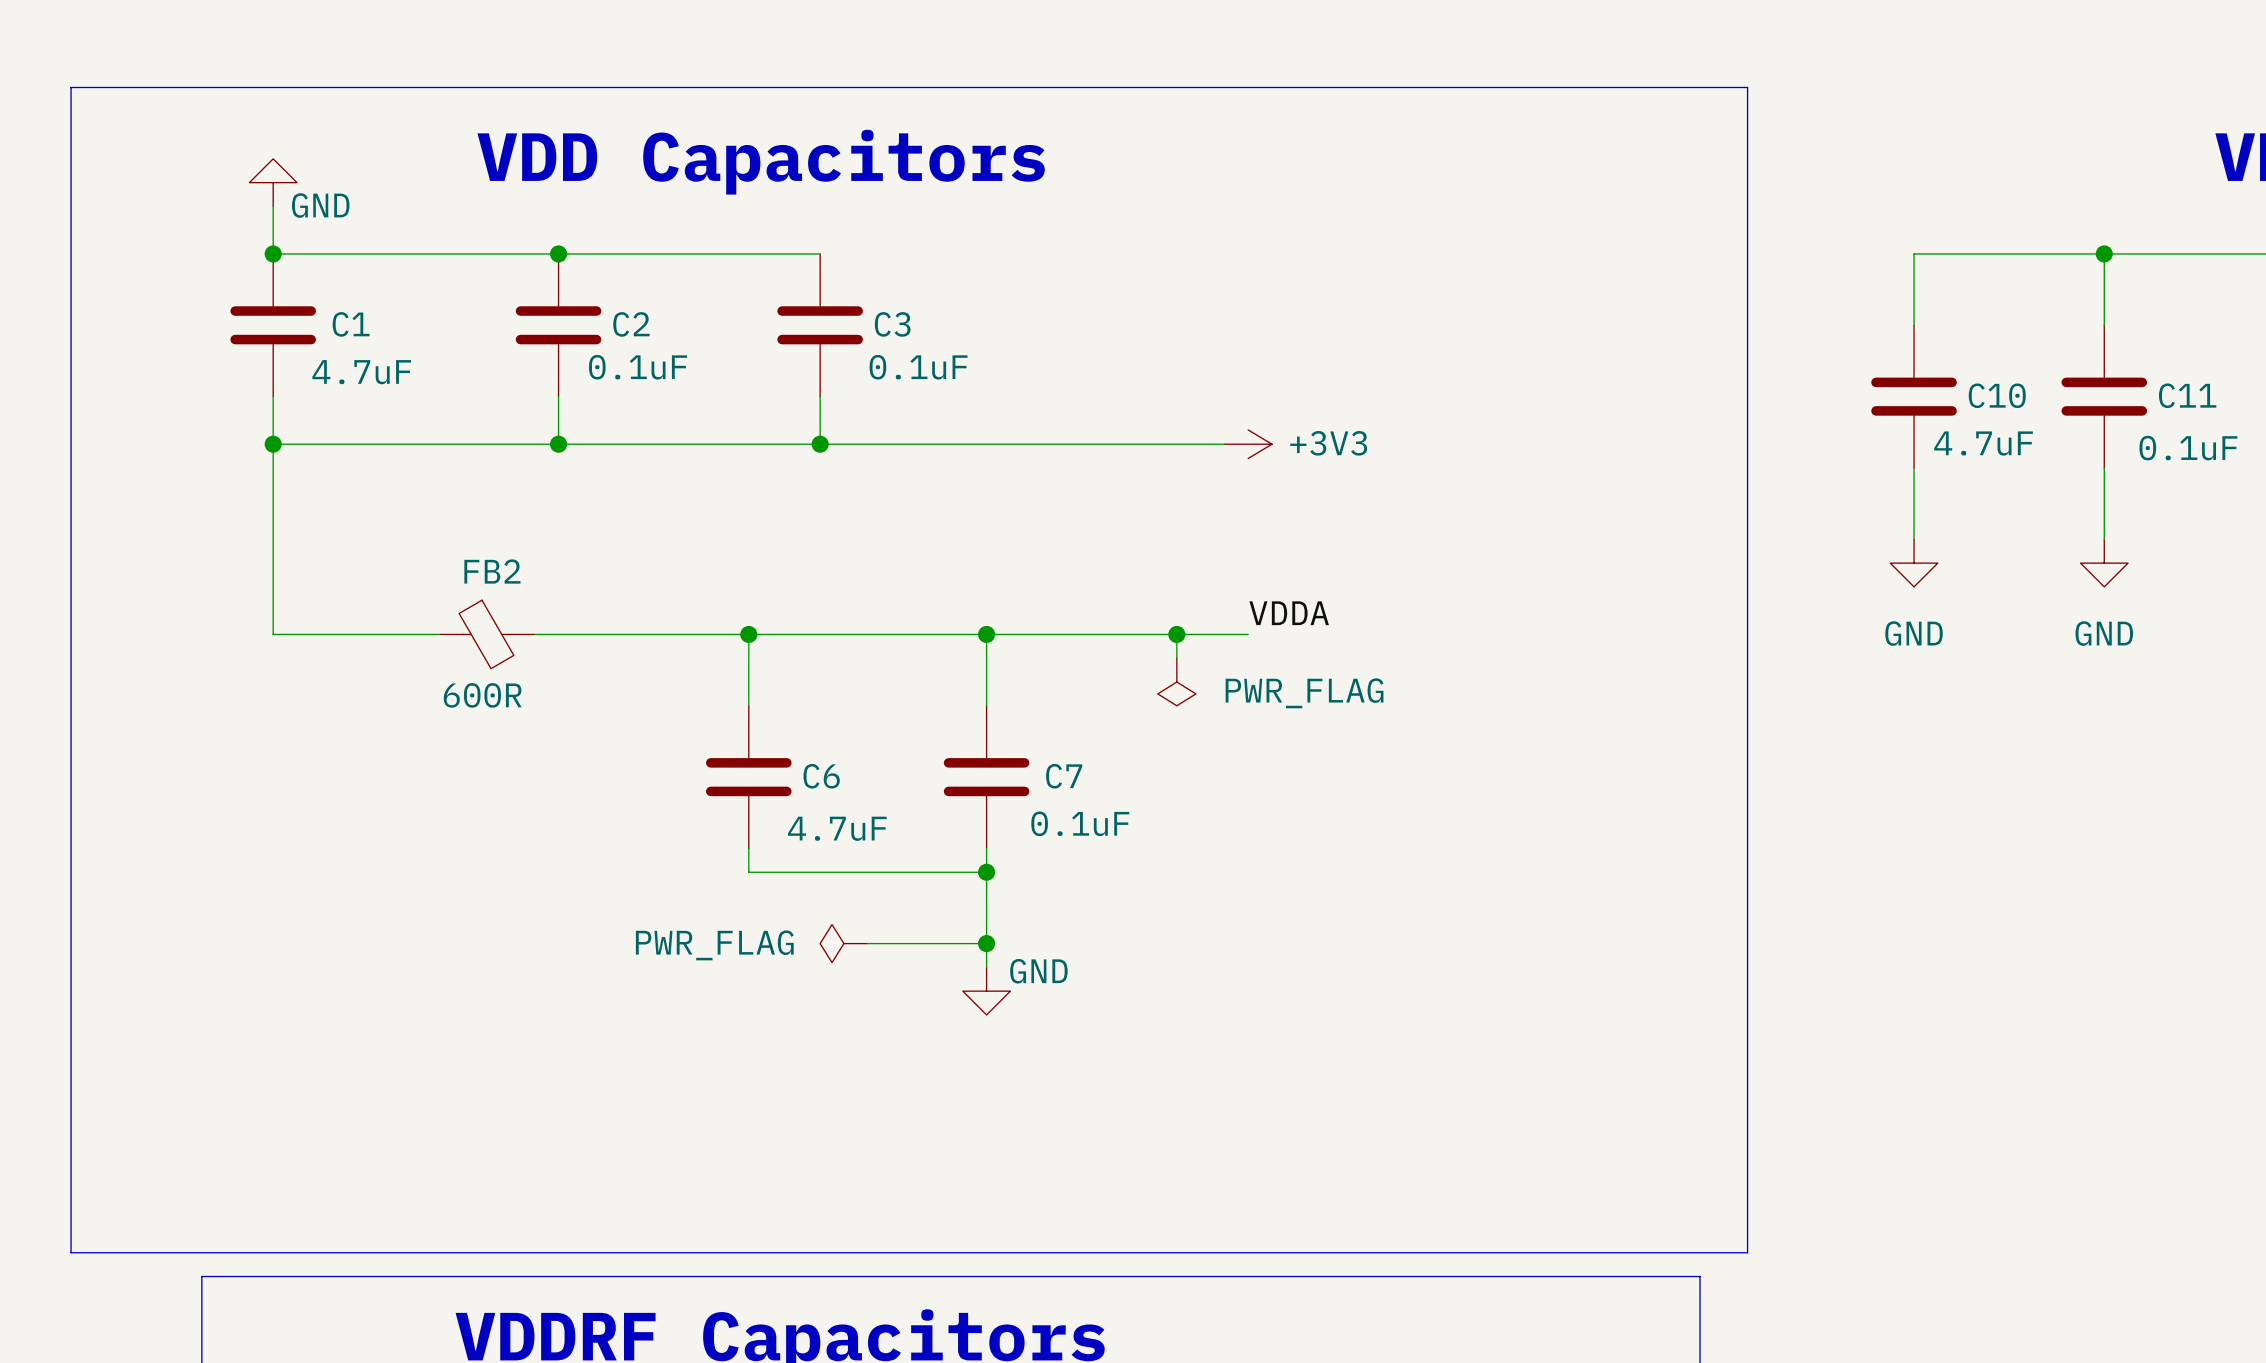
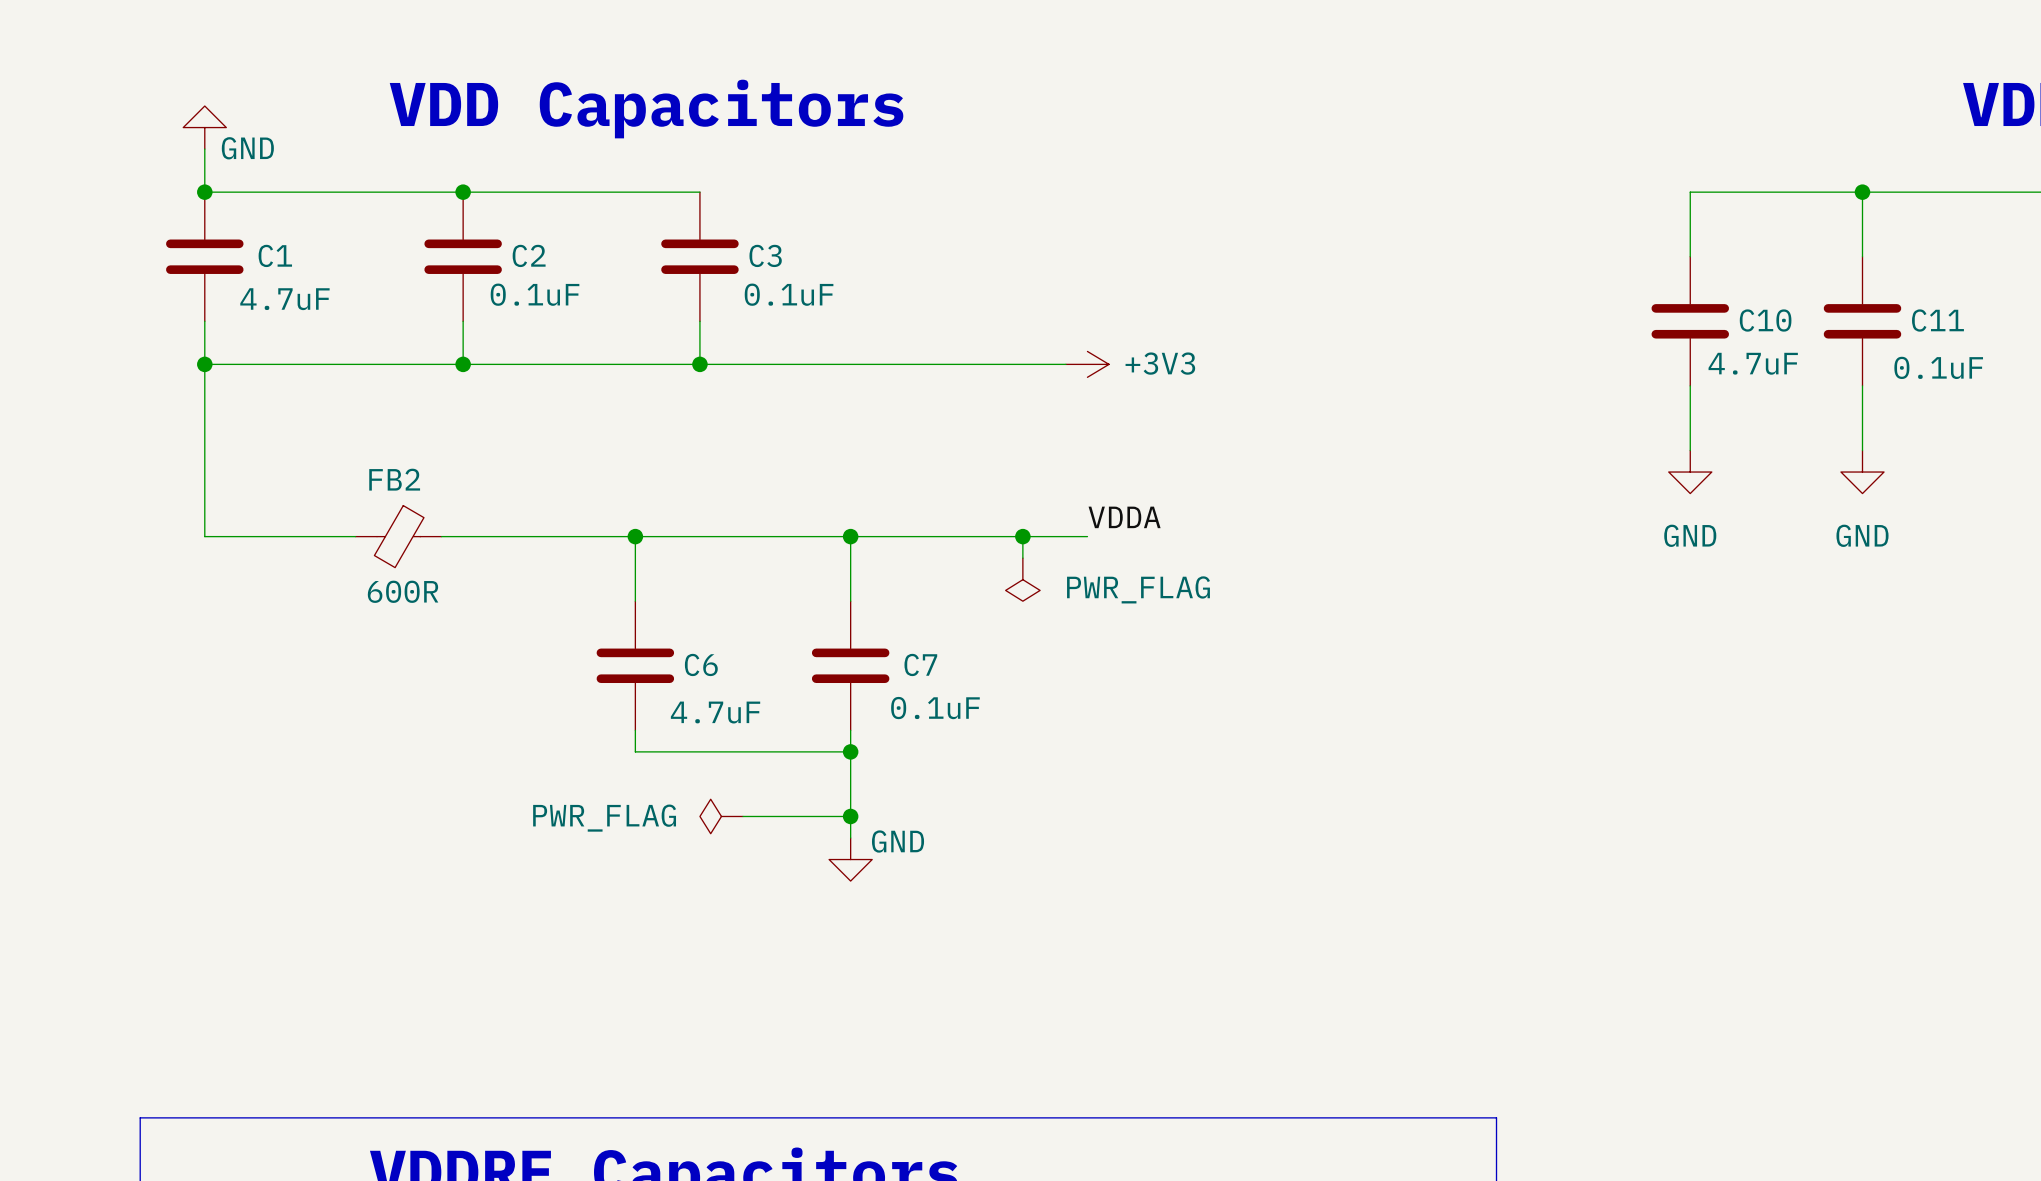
line: (71, 87) (1747, 87) (1747, 1252) (71, 1252) (71, 87) -> none
FB2 flip: as is (486, 634) -> left-right (399, 536)

